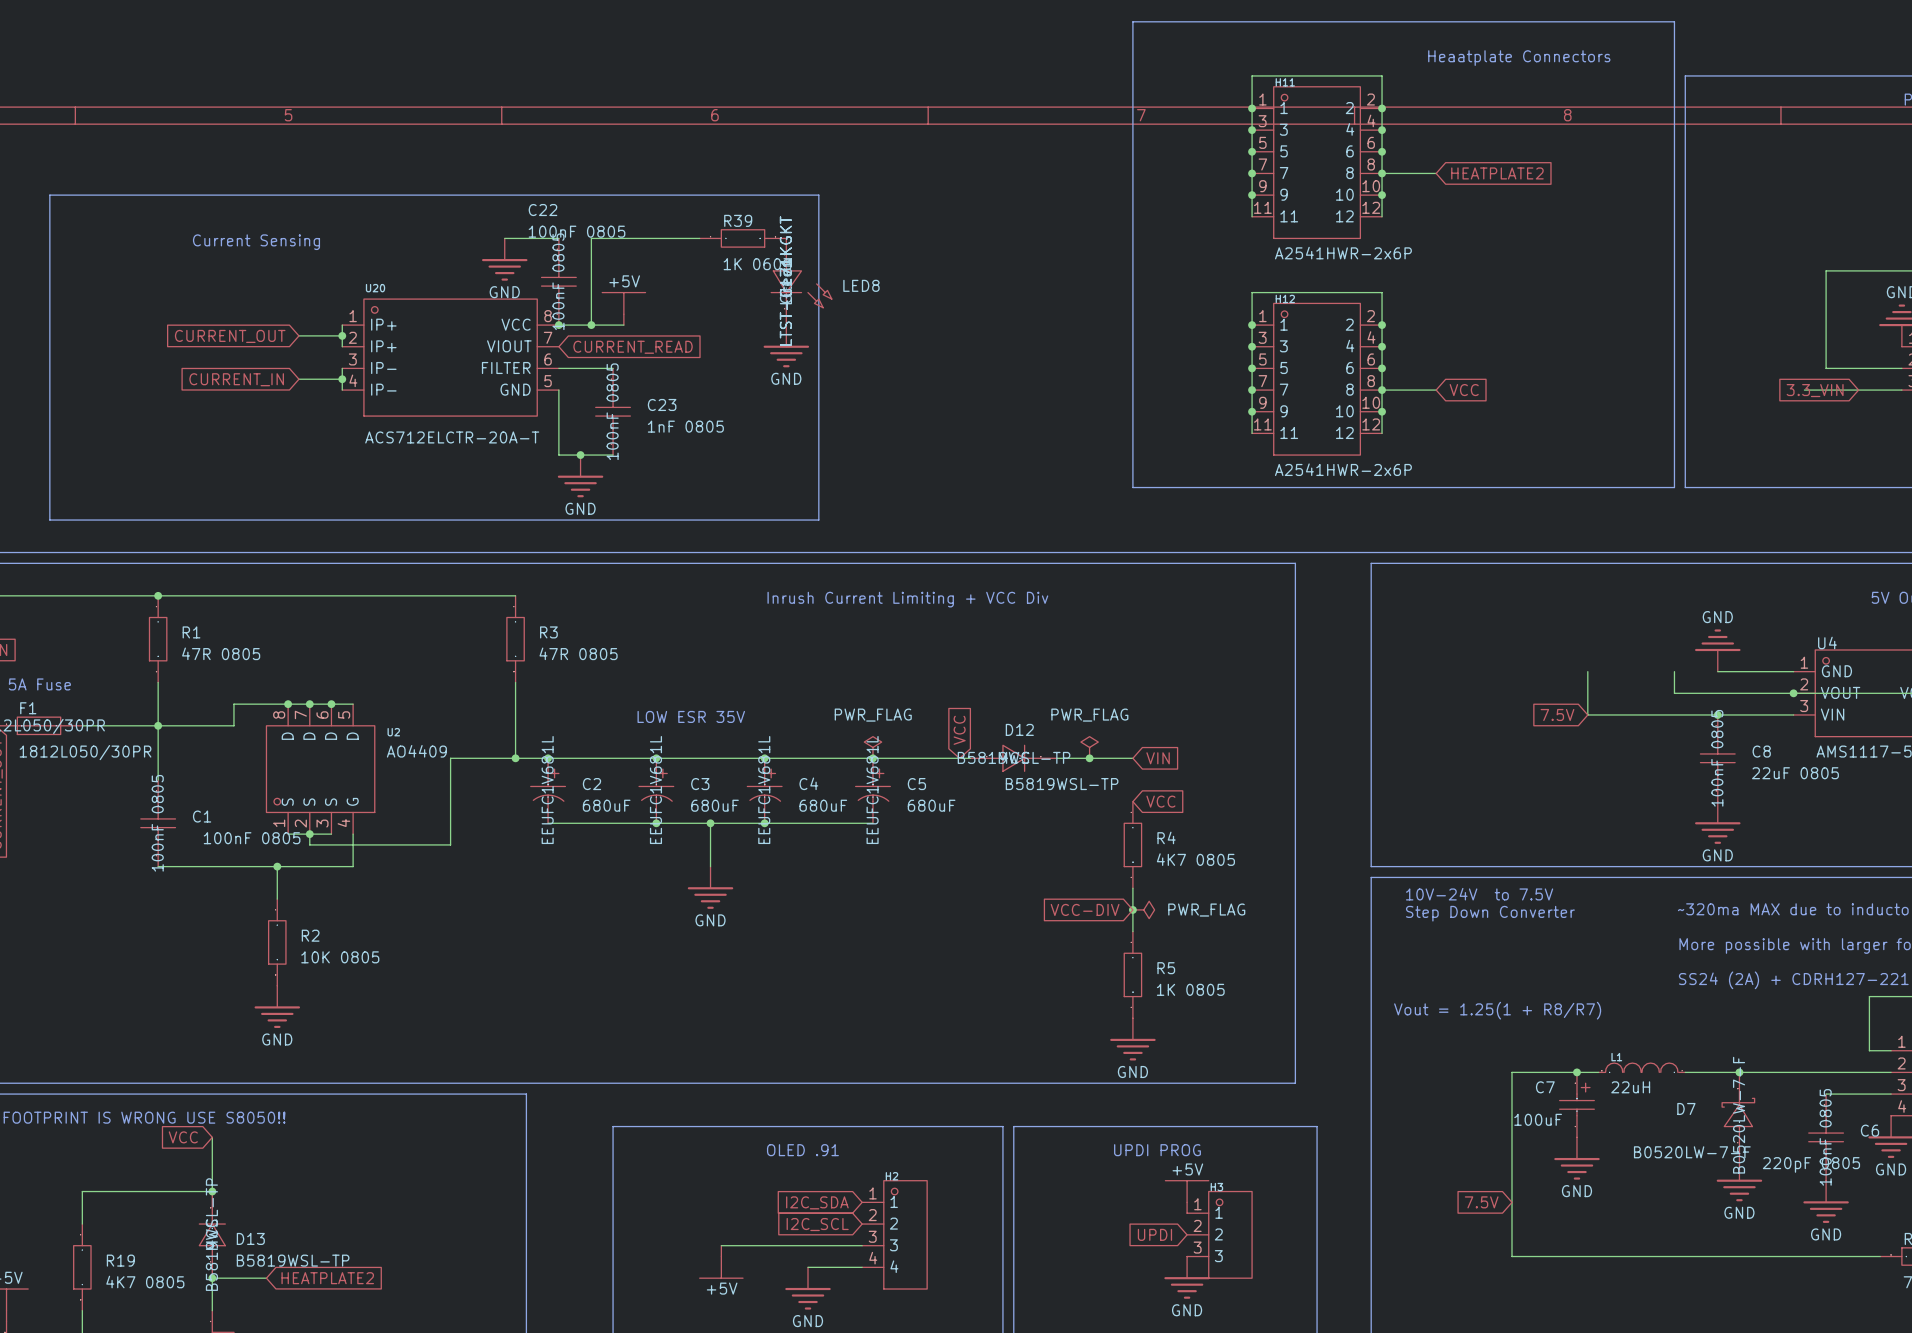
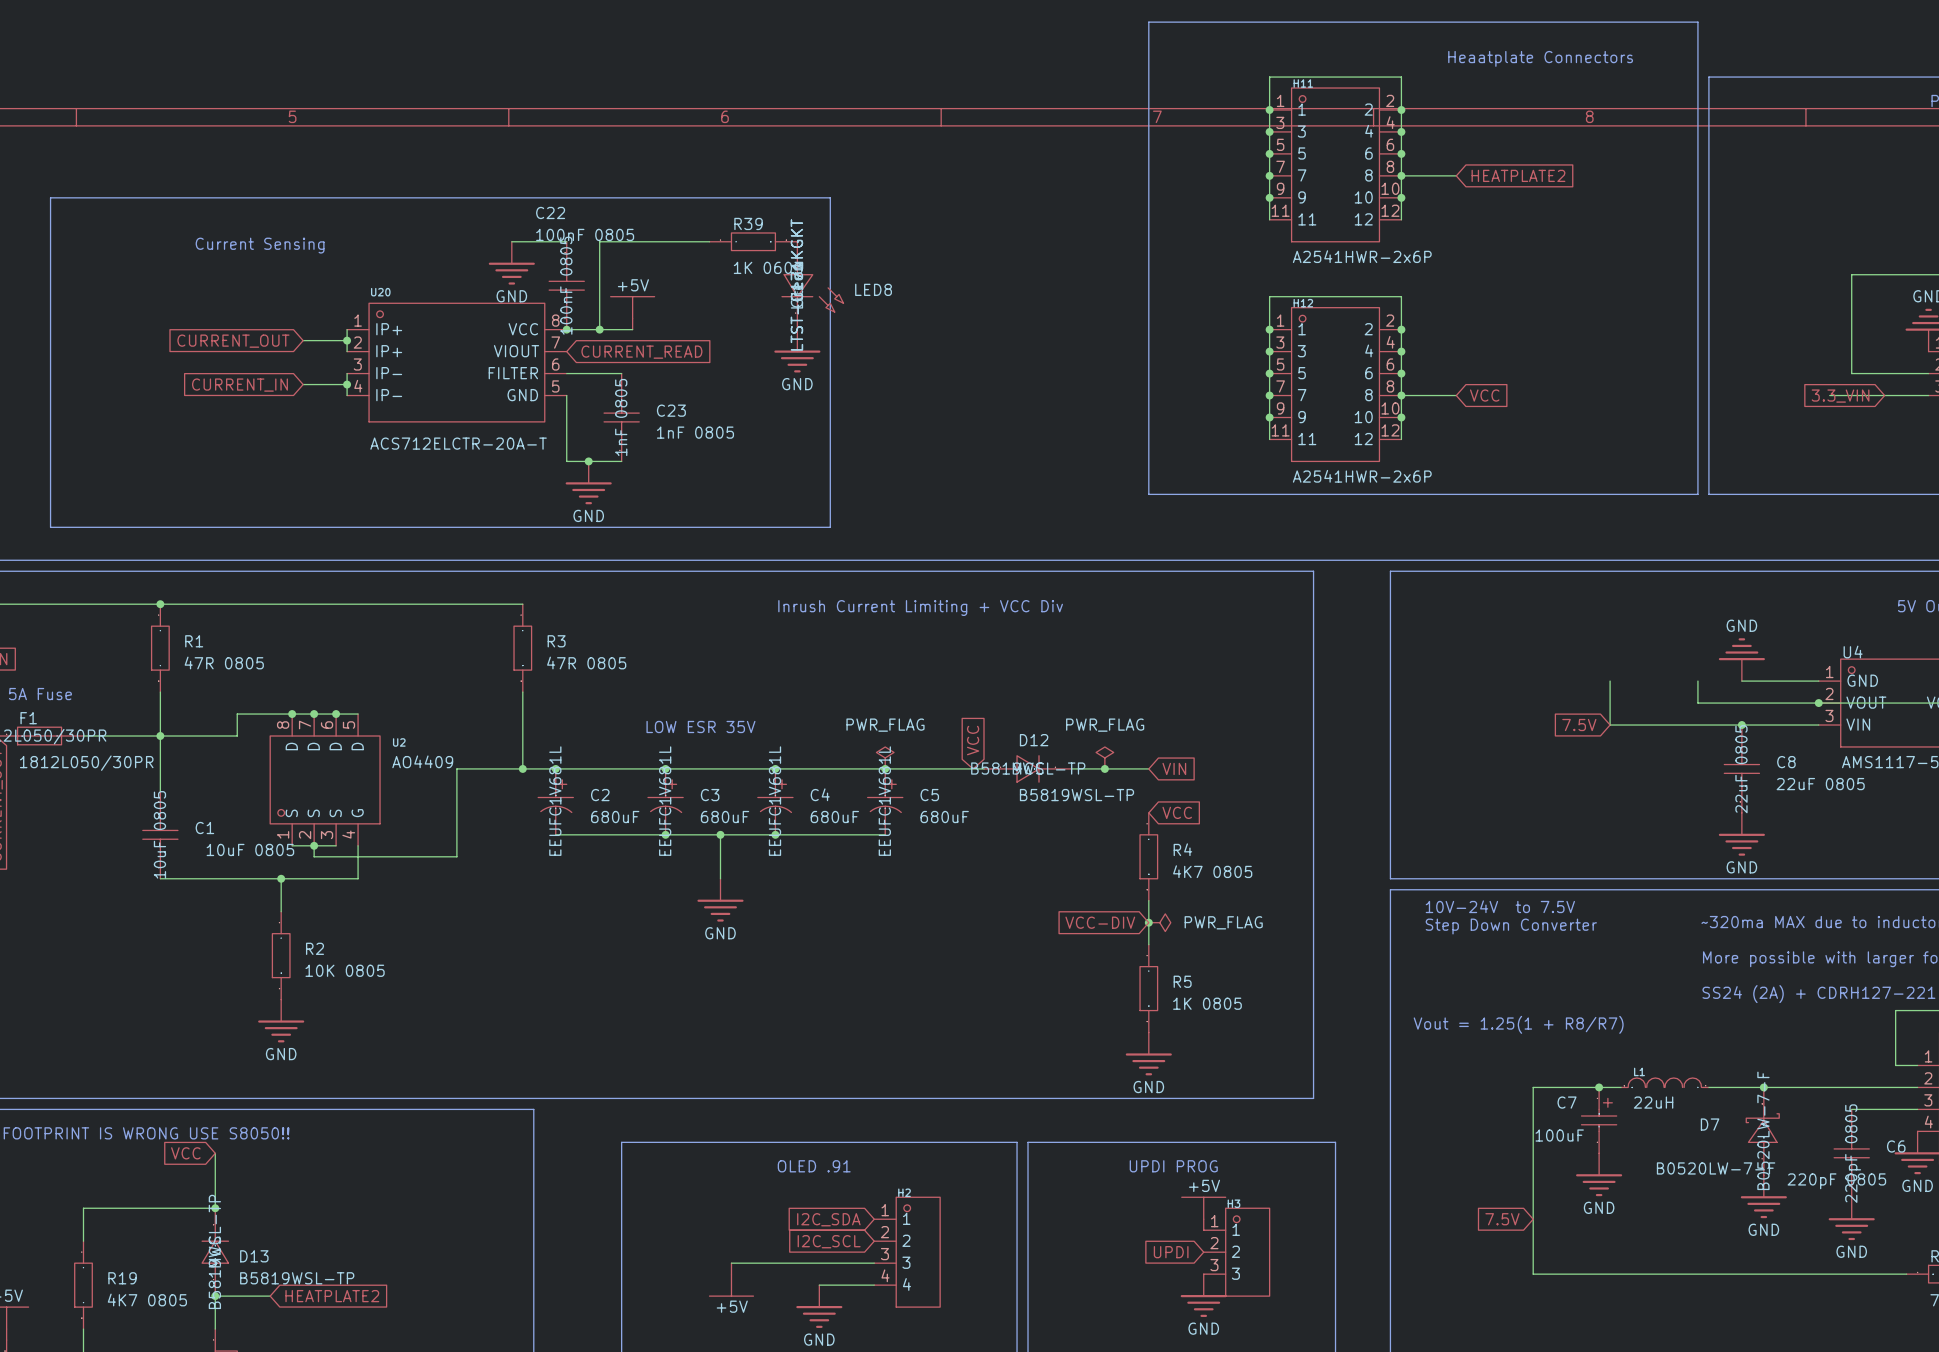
C23 text: 100nF 0805 (612, 411) -> 1nF 0805 (621, 417)
C8 text: 100nF 0805 (1717, 758) -> 22uF 0805 (1741, 769)
C1 text: 100nF 0805 (157, 823) -> 10uF 0805 (159, 834)
C1 value: 100nF 0805 (252, 838) -> 10uF 0805 (250, 849)
C6 text: 100nF 0805 (1825, 1137) -> 220pF 0805 (1853, 1153)

